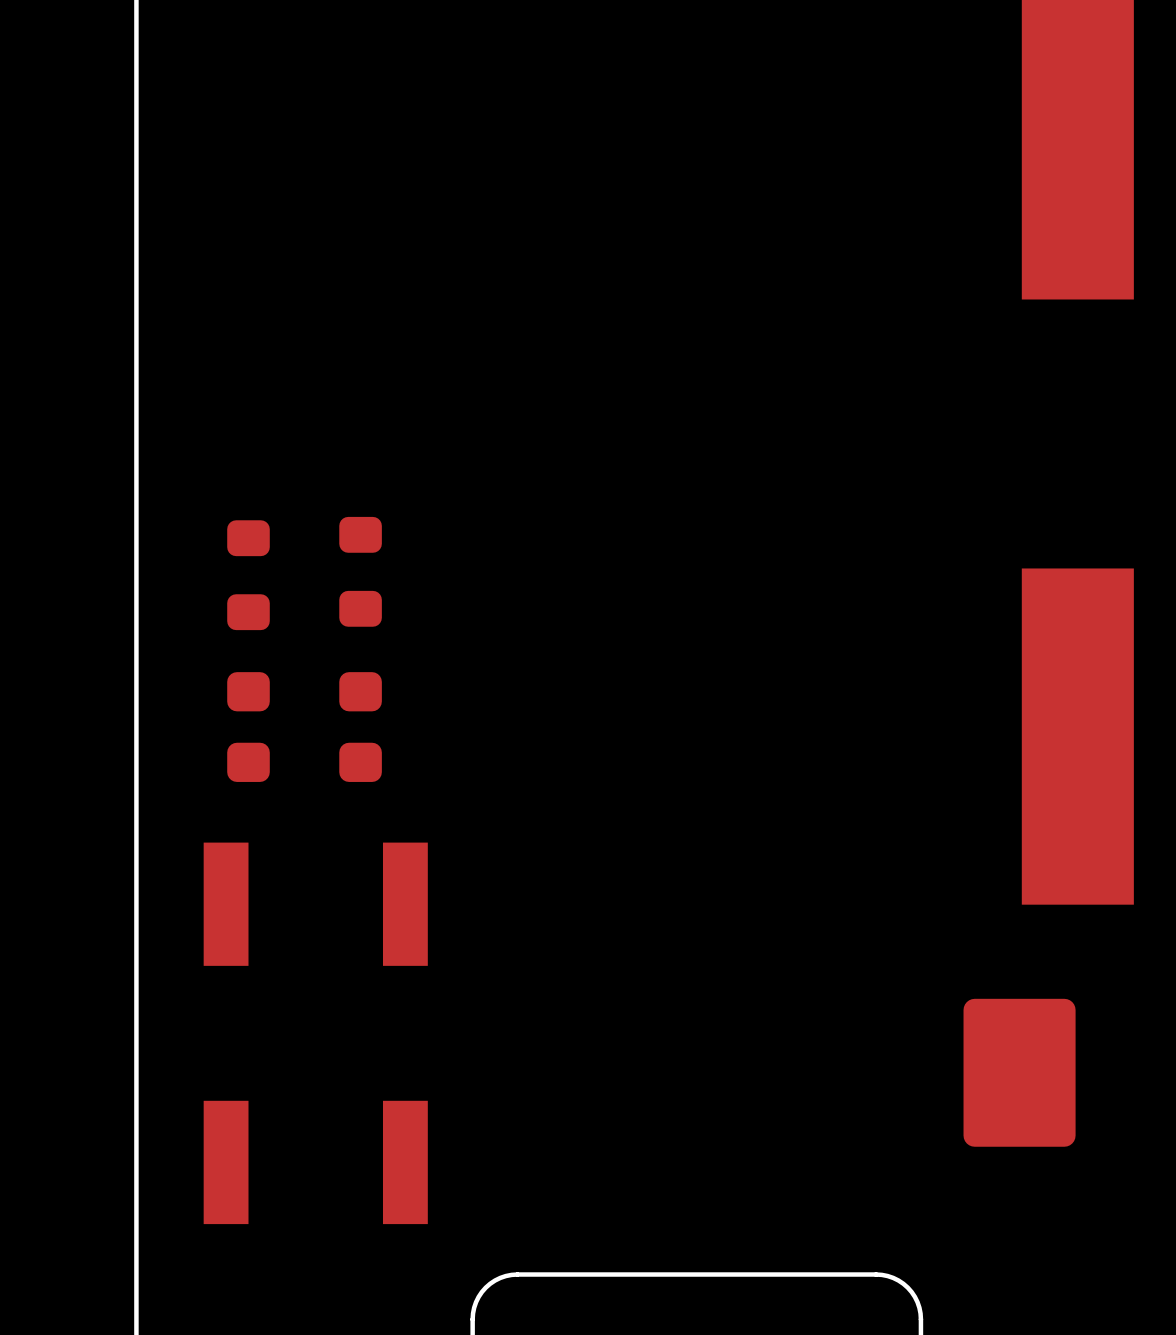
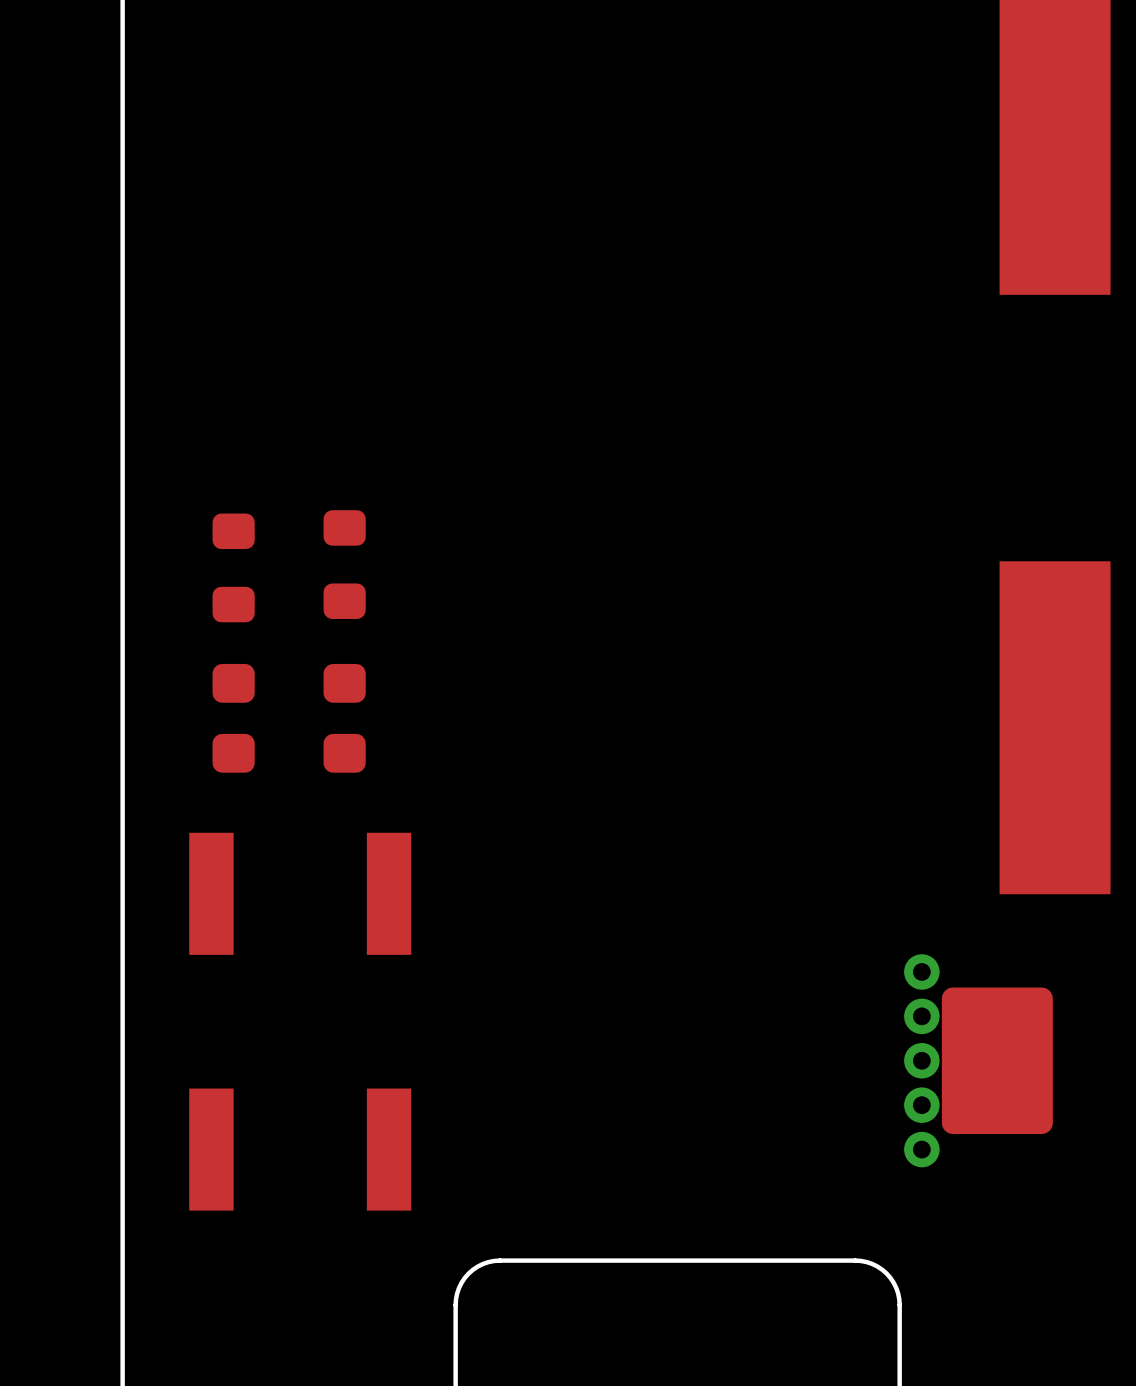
via: none -> (921, 971)
via: none -> (921, 1016)
via: none -> (921, 1060)
via: none -> (921, 1105)
via: none -> (921, 1149)

